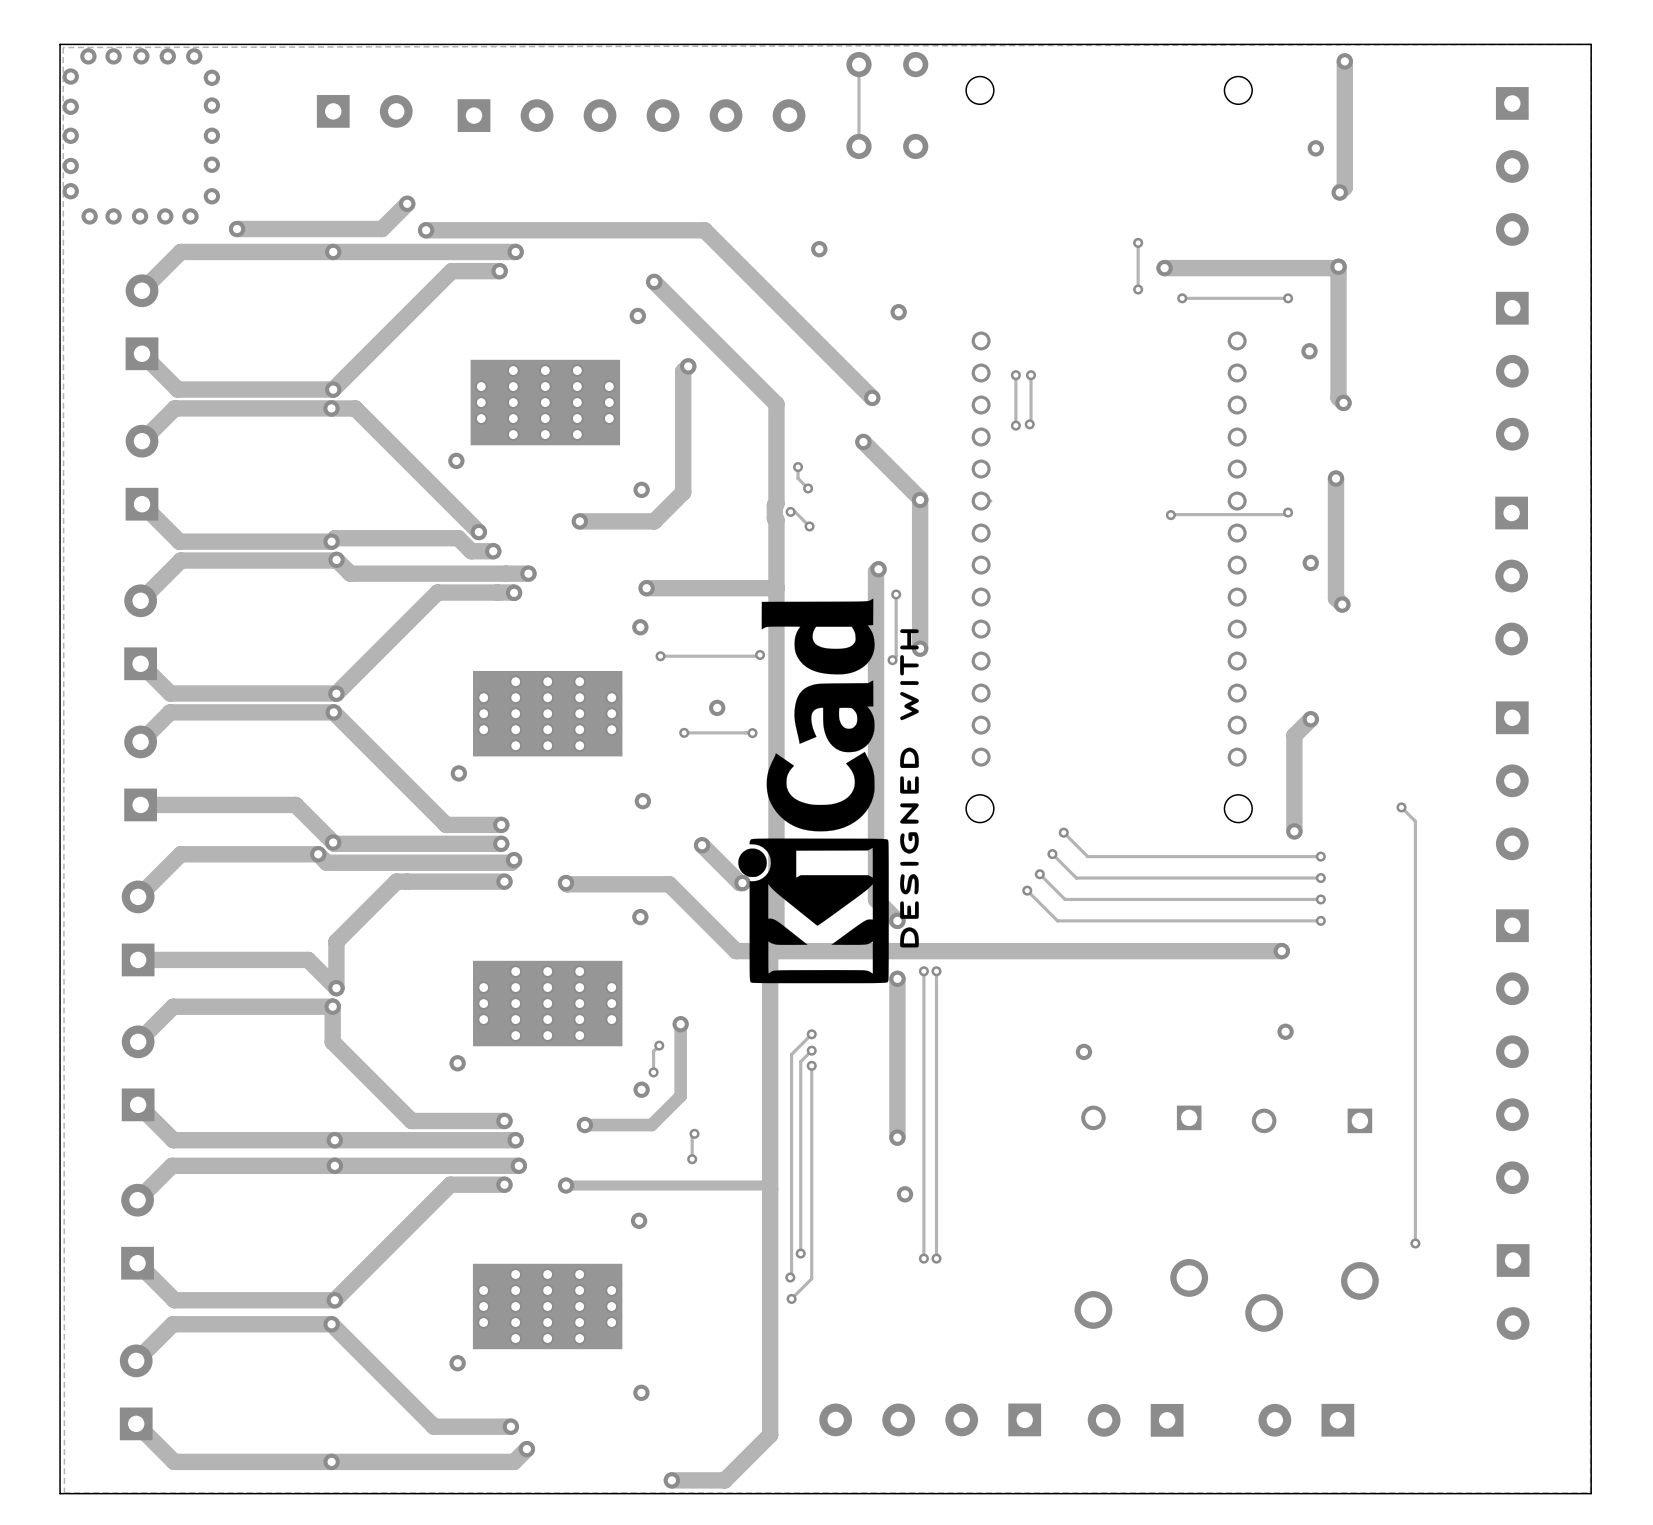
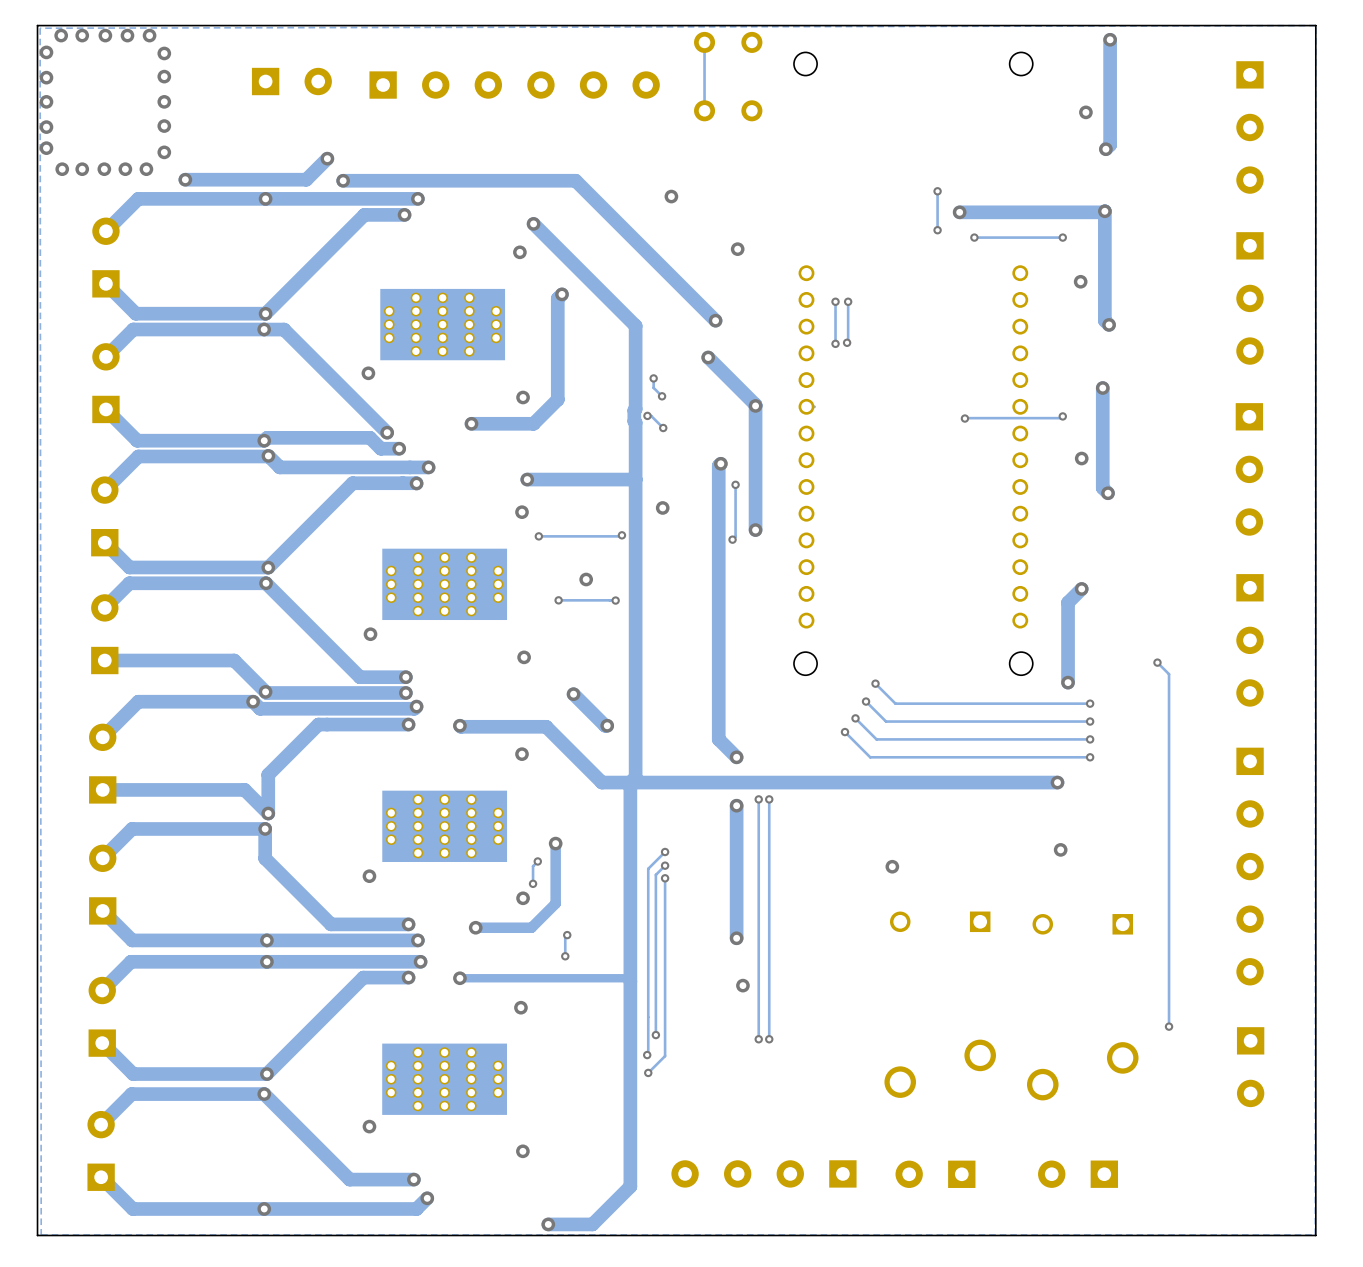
drawing: [738, 598, 919, 984] -> none

